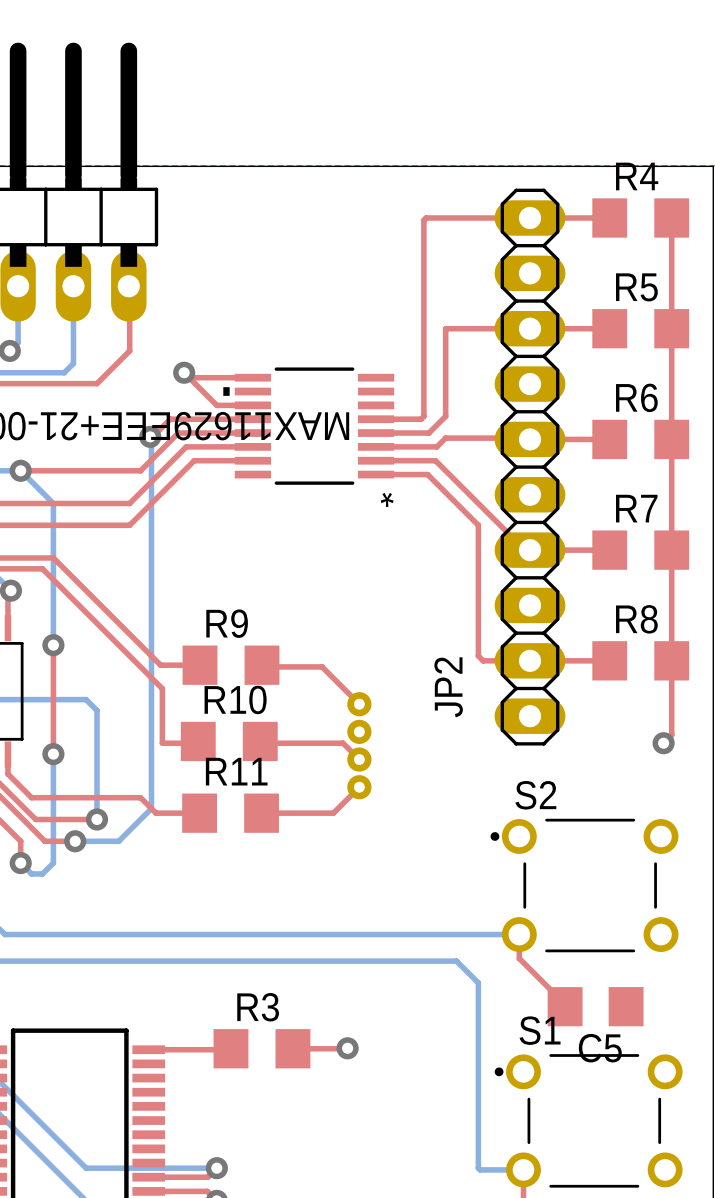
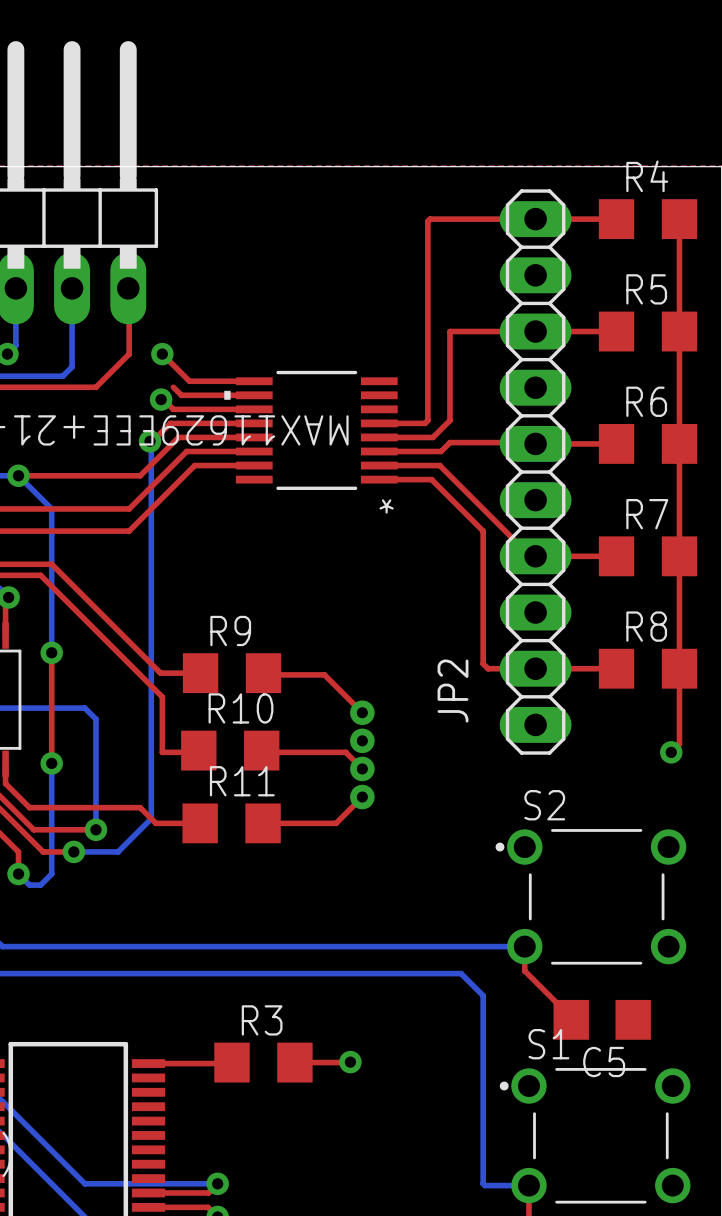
top track: none -> (162, 354) (184, 376)
via: none -> (162, 354)
via: (184, 372) -> none
top track: (189, 377) (216, 405) -> (161, 399) (162, 398) (173, 409) (217, 409)
top track: none -> (173, 387) (181, 395) (254, 395)
via: none -> (161, 399)

